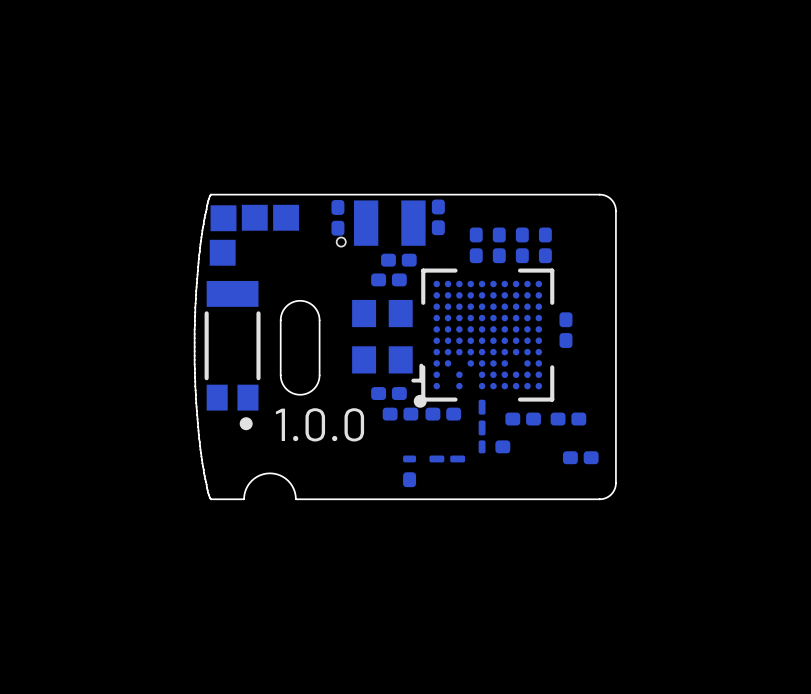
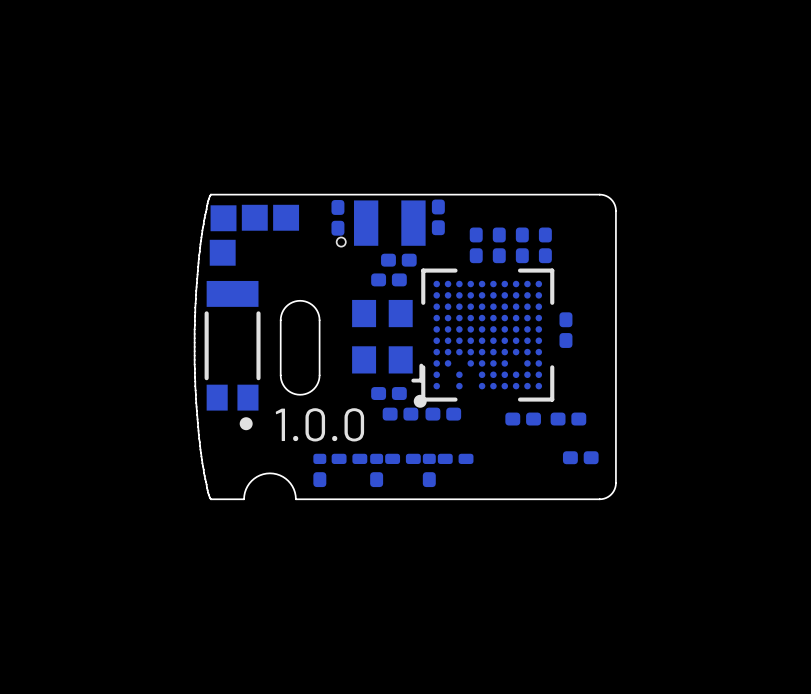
part: (482, 417) -> none
part: (494, 446) -> none
part footprint: [429, 455, 466, 463] -> [437, 453, 474, 465]
part: none -> (349, 458)
part: none -> (402, 458)
part: none -> (319, 470)
part: none -> (376, 470)
part: none -> (429, 470)
part: (409, 471) -> none

